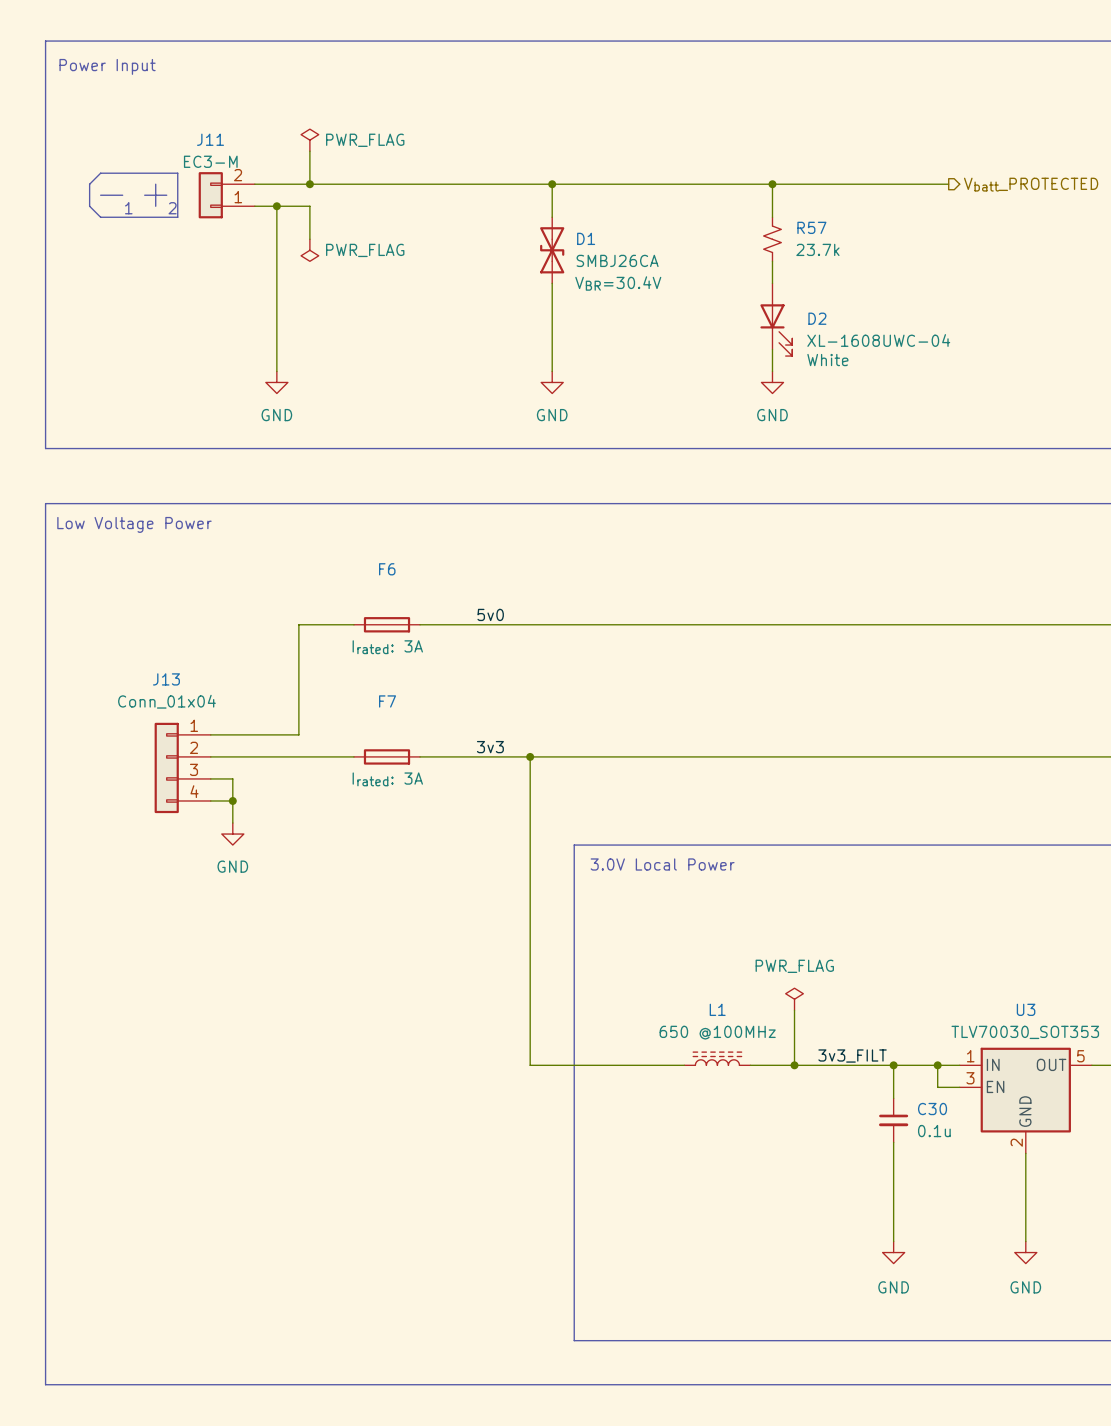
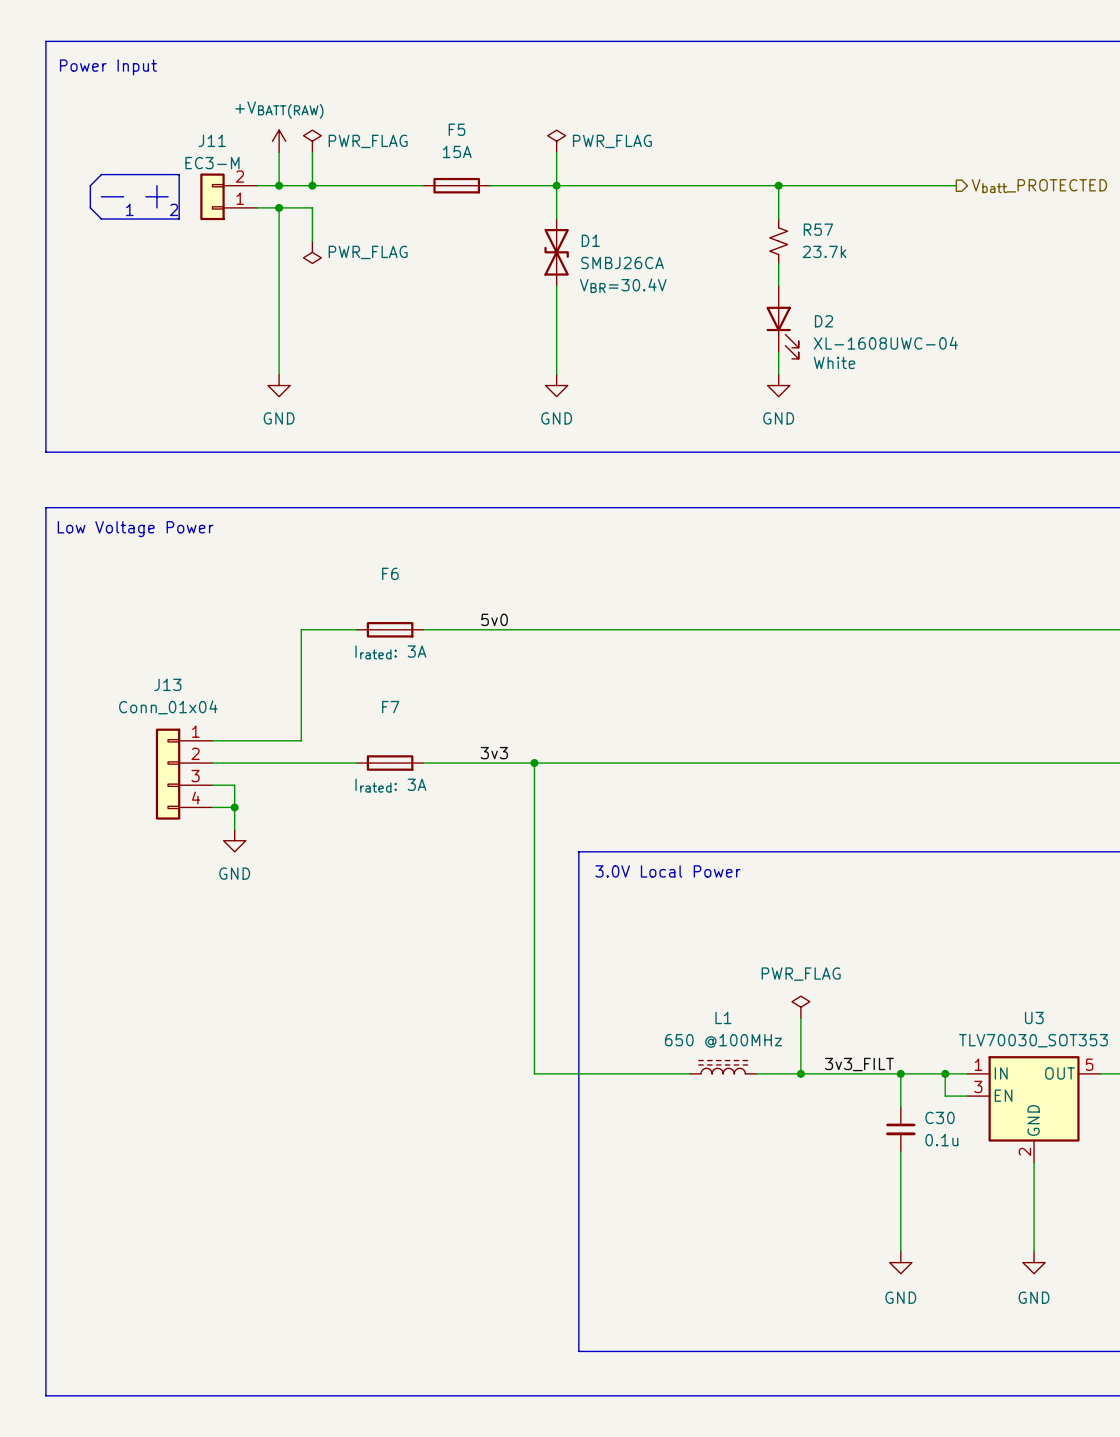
power symbol: none -> +VBATT(RAW) (279, 141)
power symbol: none -> PWR_FLAG (556, 141)
wire: none -> (279, 152) (279, 185)
wire: none -> (556, 152) (556, 185)
junction: none -> (279, 185)
F5: none -> 15A (456, 185)

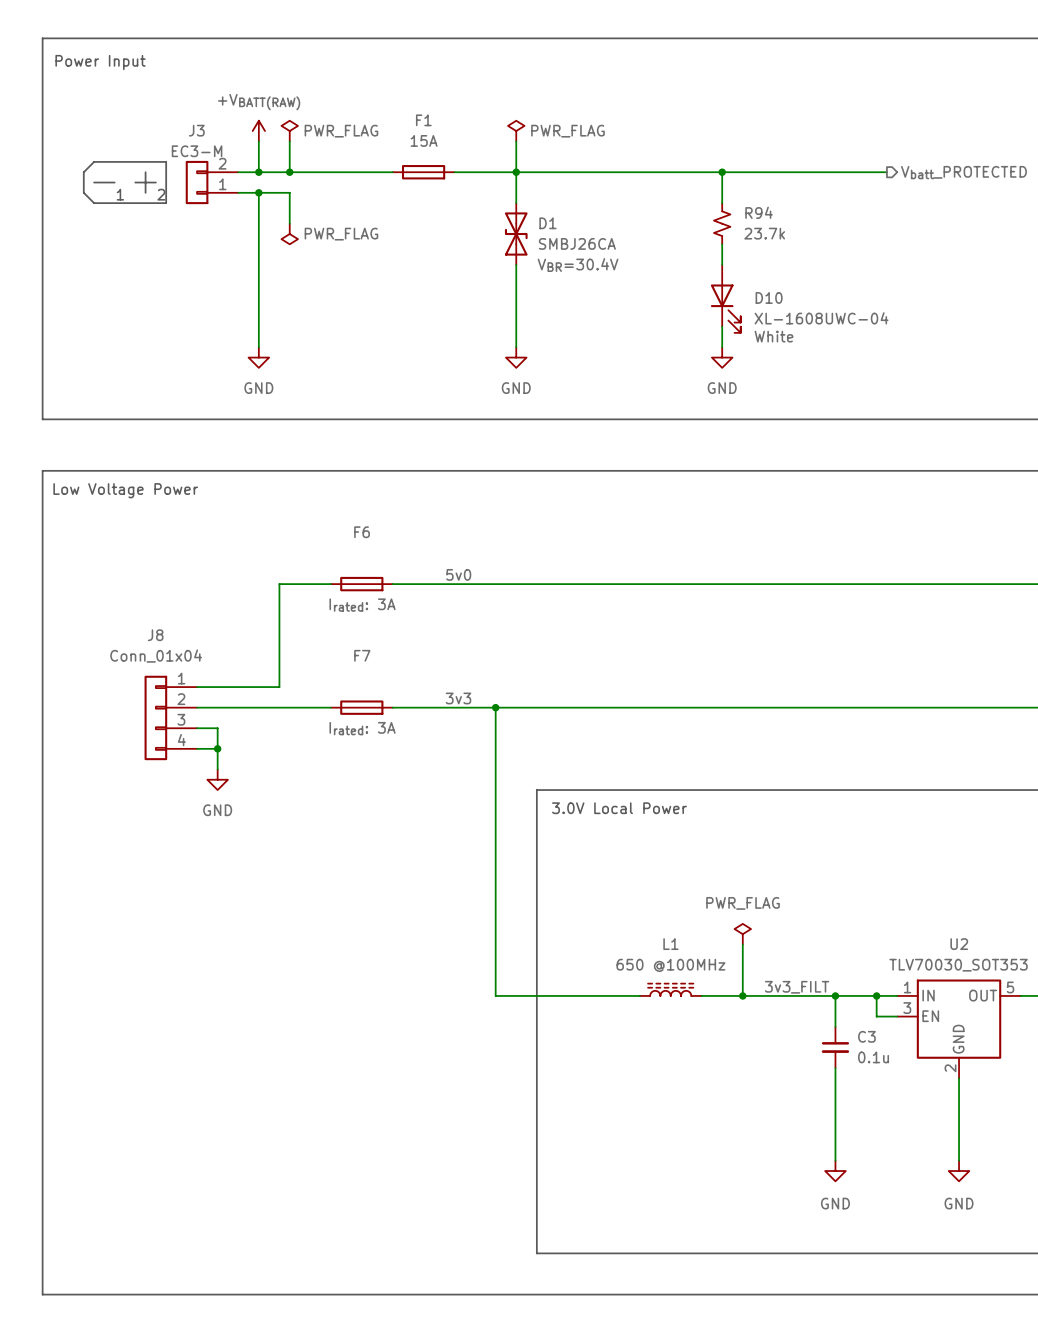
F5 name: F5 (456, 129) -> F1 (423, 120)
J11 name: J11 (212, 140) -> J3 (196, 130)
R57 name: R57 (818, 229) -> R94 (759, 212)
D2 name: D2 (823, 321) -> D10 (769, 297)
J13 name: J13 (167, 684) -> J8 (155, 635)
U3 name: U3 (1034, 1017) -> U2 (959, 944)
C30 name: C30 (940, 1117) -> C3 (866, 1036)

